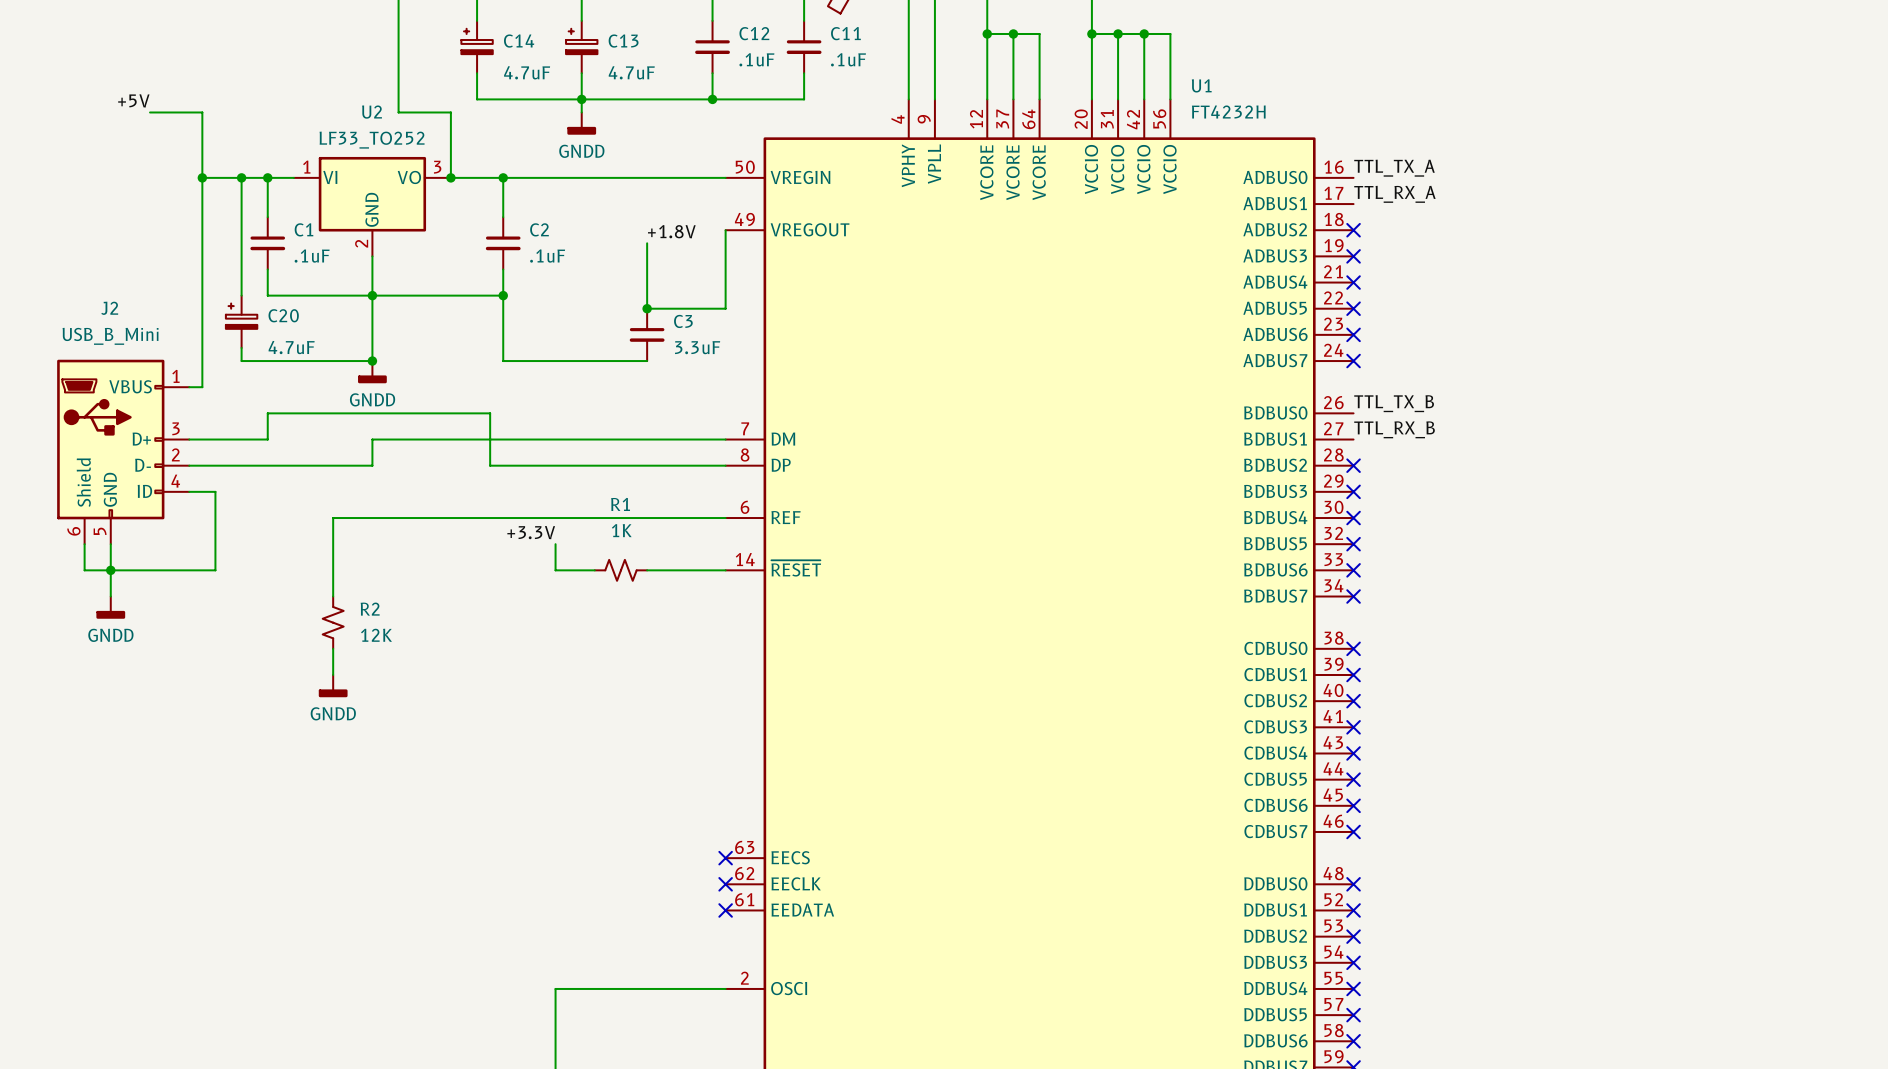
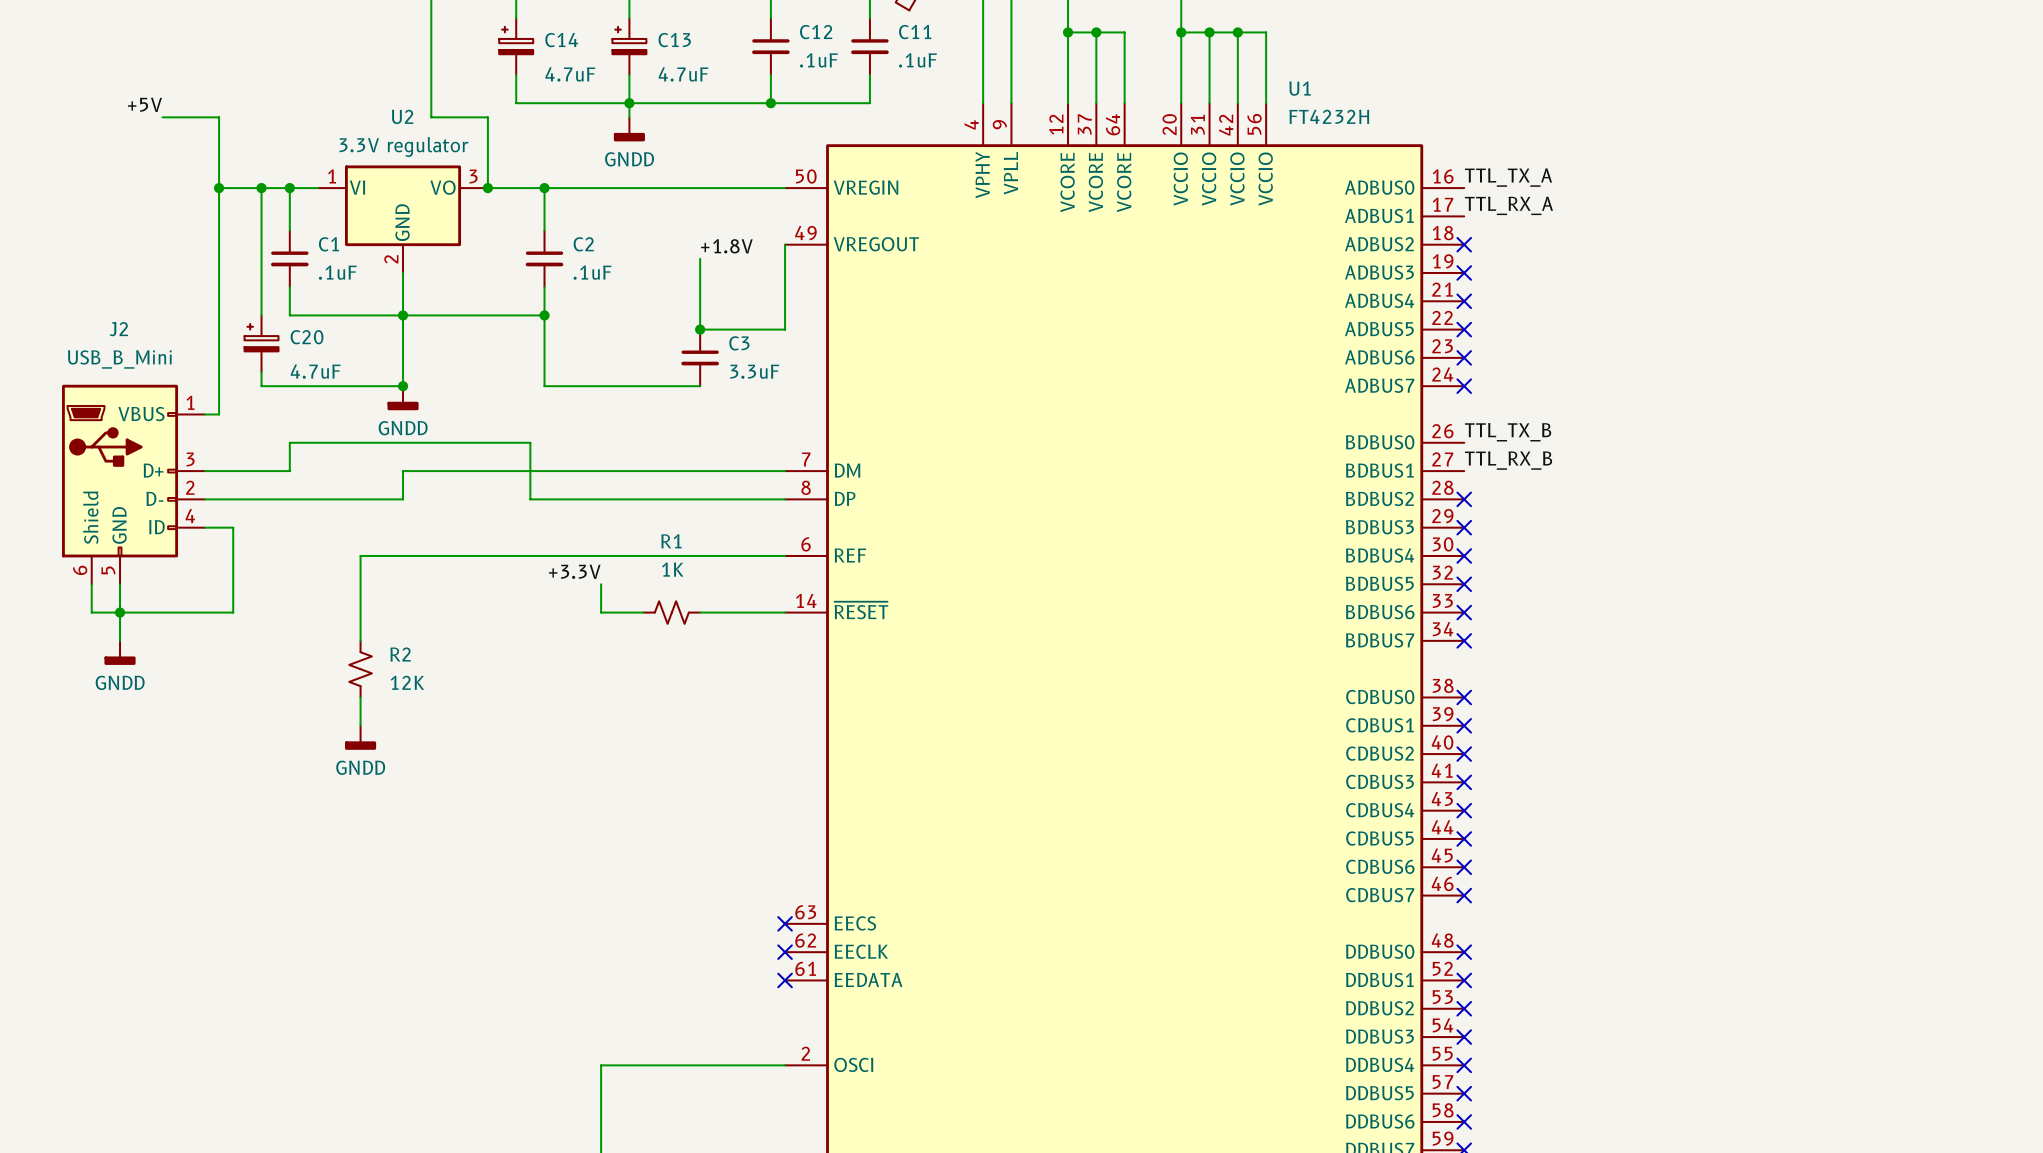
U2 value: LF33_TO252 (372, 140) -> 3.3V regulator (403, 147)

